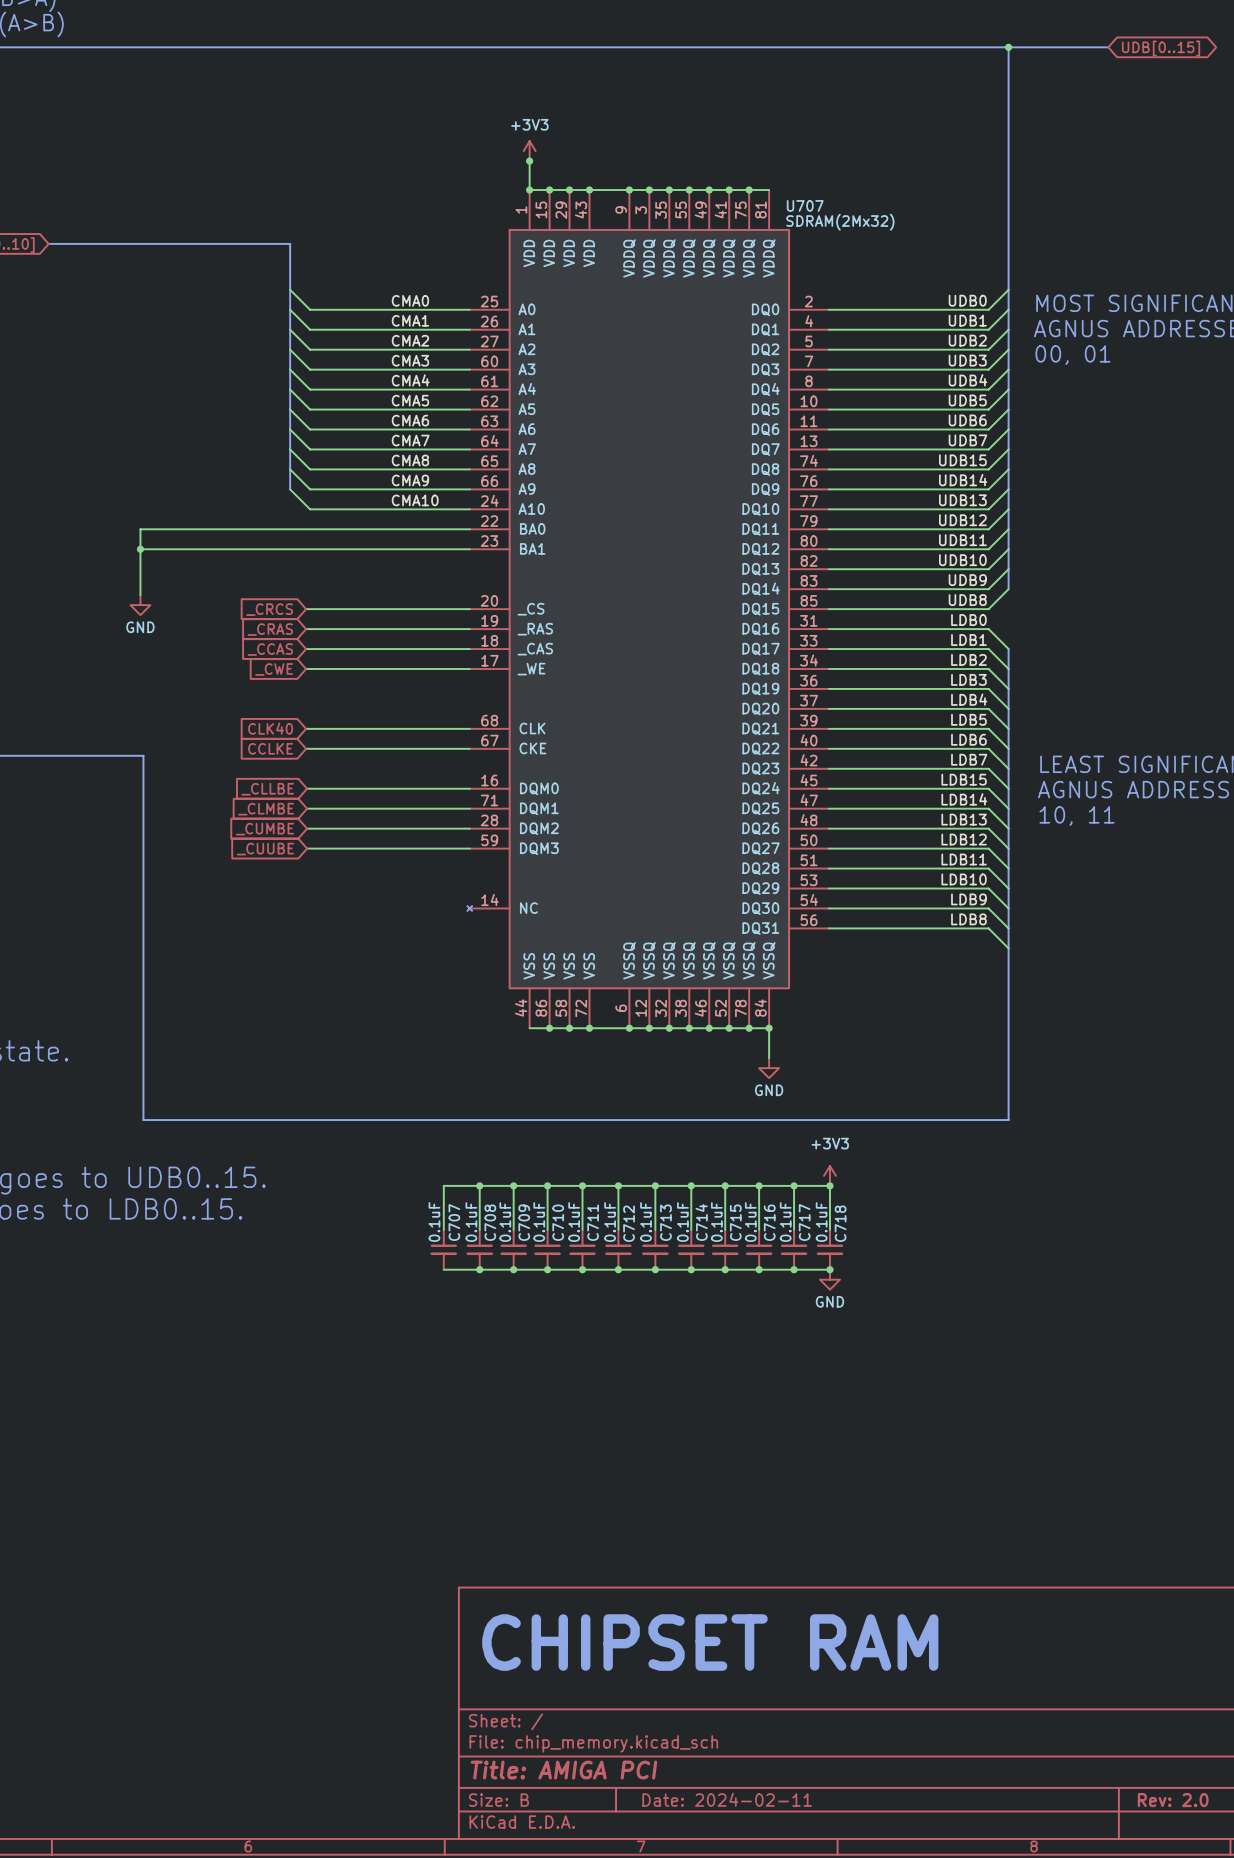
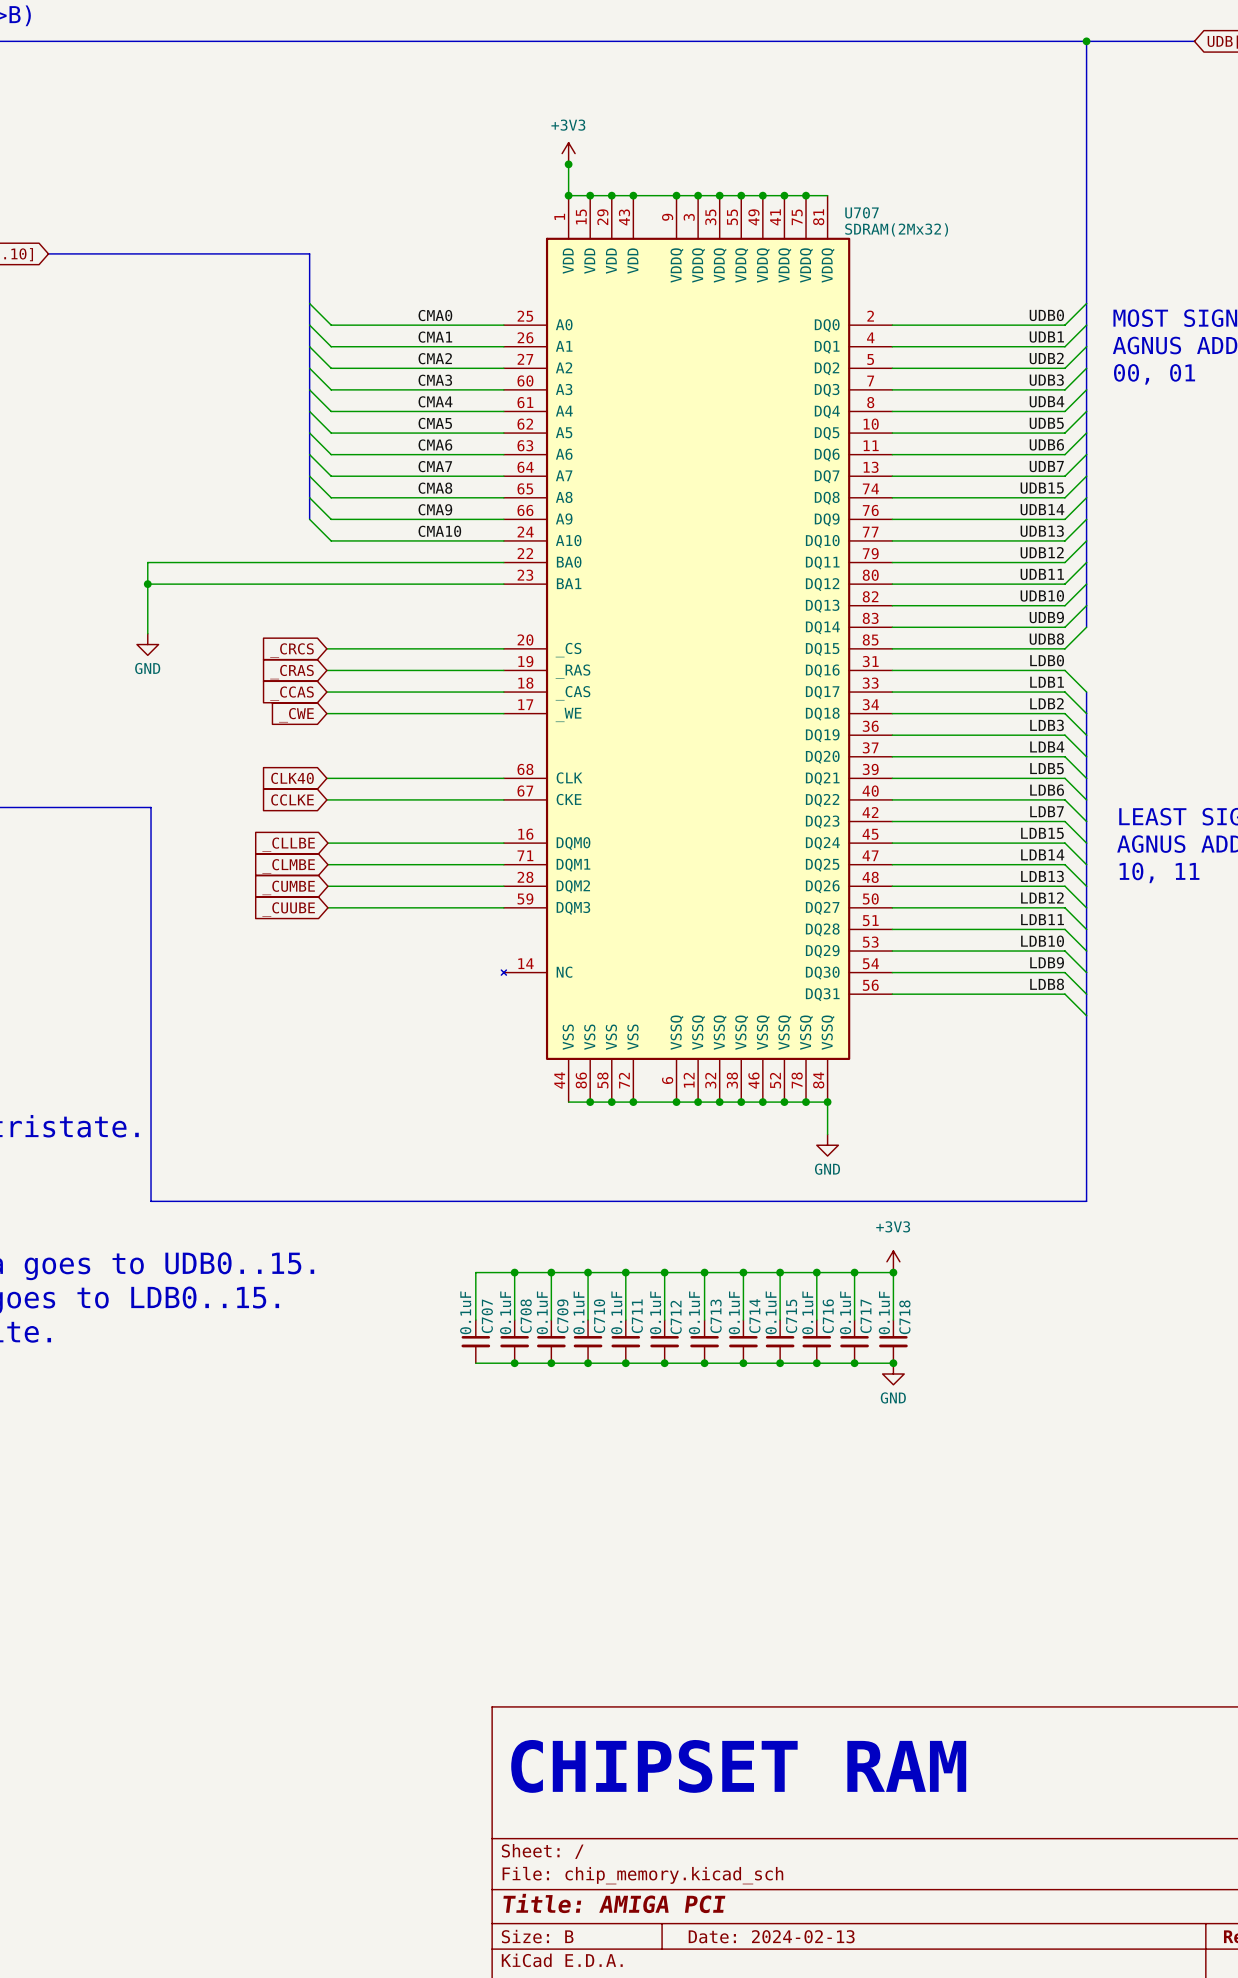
title block: Date: 2024-02-11 (727, 1799) -> Date: 2024-02-13 (771, 1936)

